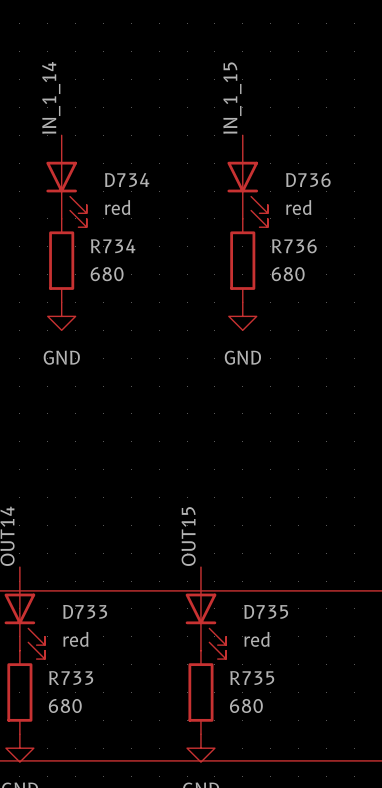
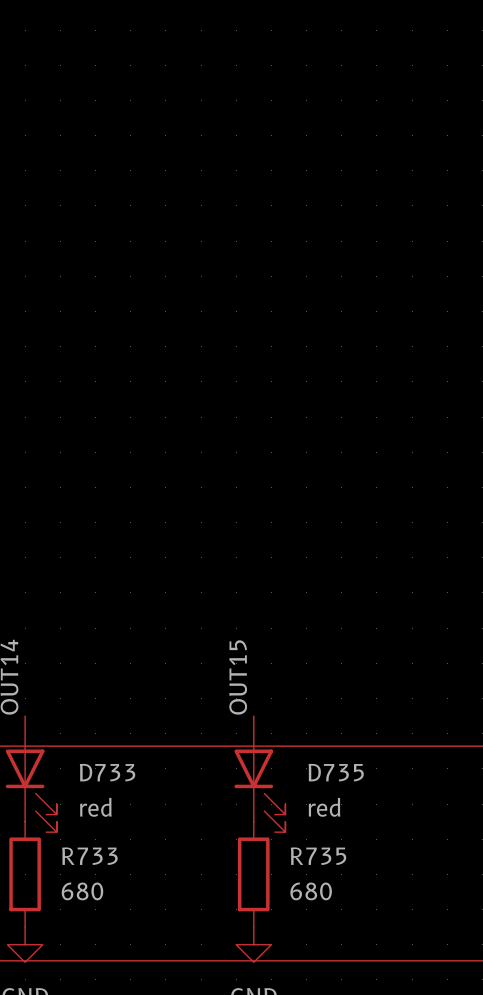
label: IN_1_14 (51, 97) -> none
label: IN_1_15 (232, 98) -> none
D734: red (66, 181) -> none
D736: red (247, 181) -> none
R734: 680 (61, 260) -> none
R736: 680 (242, 260) -> none
power symbol: GND (61, 316) -> none
power symbol: GND (242, 316) -> none

